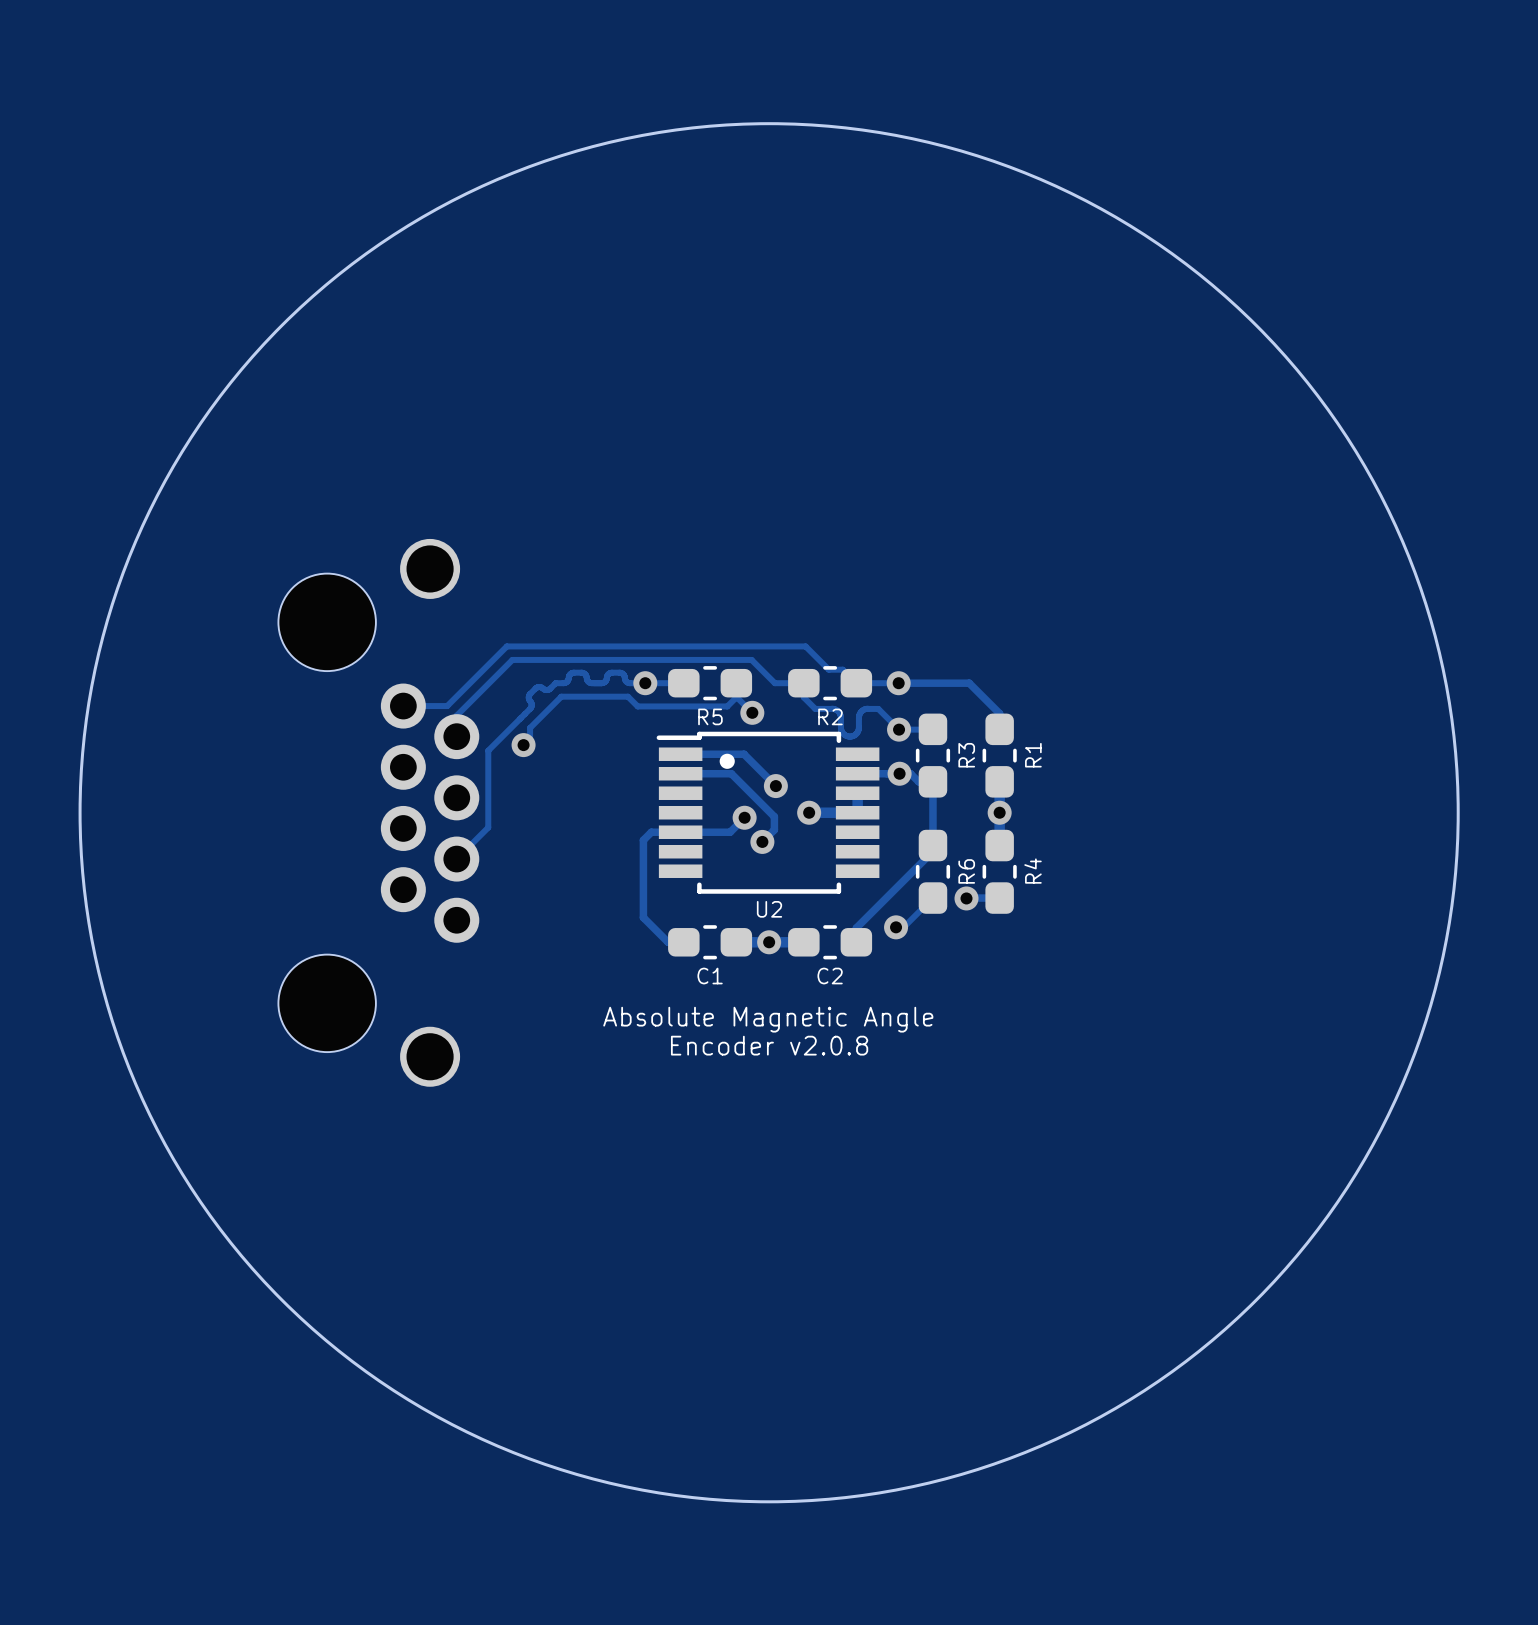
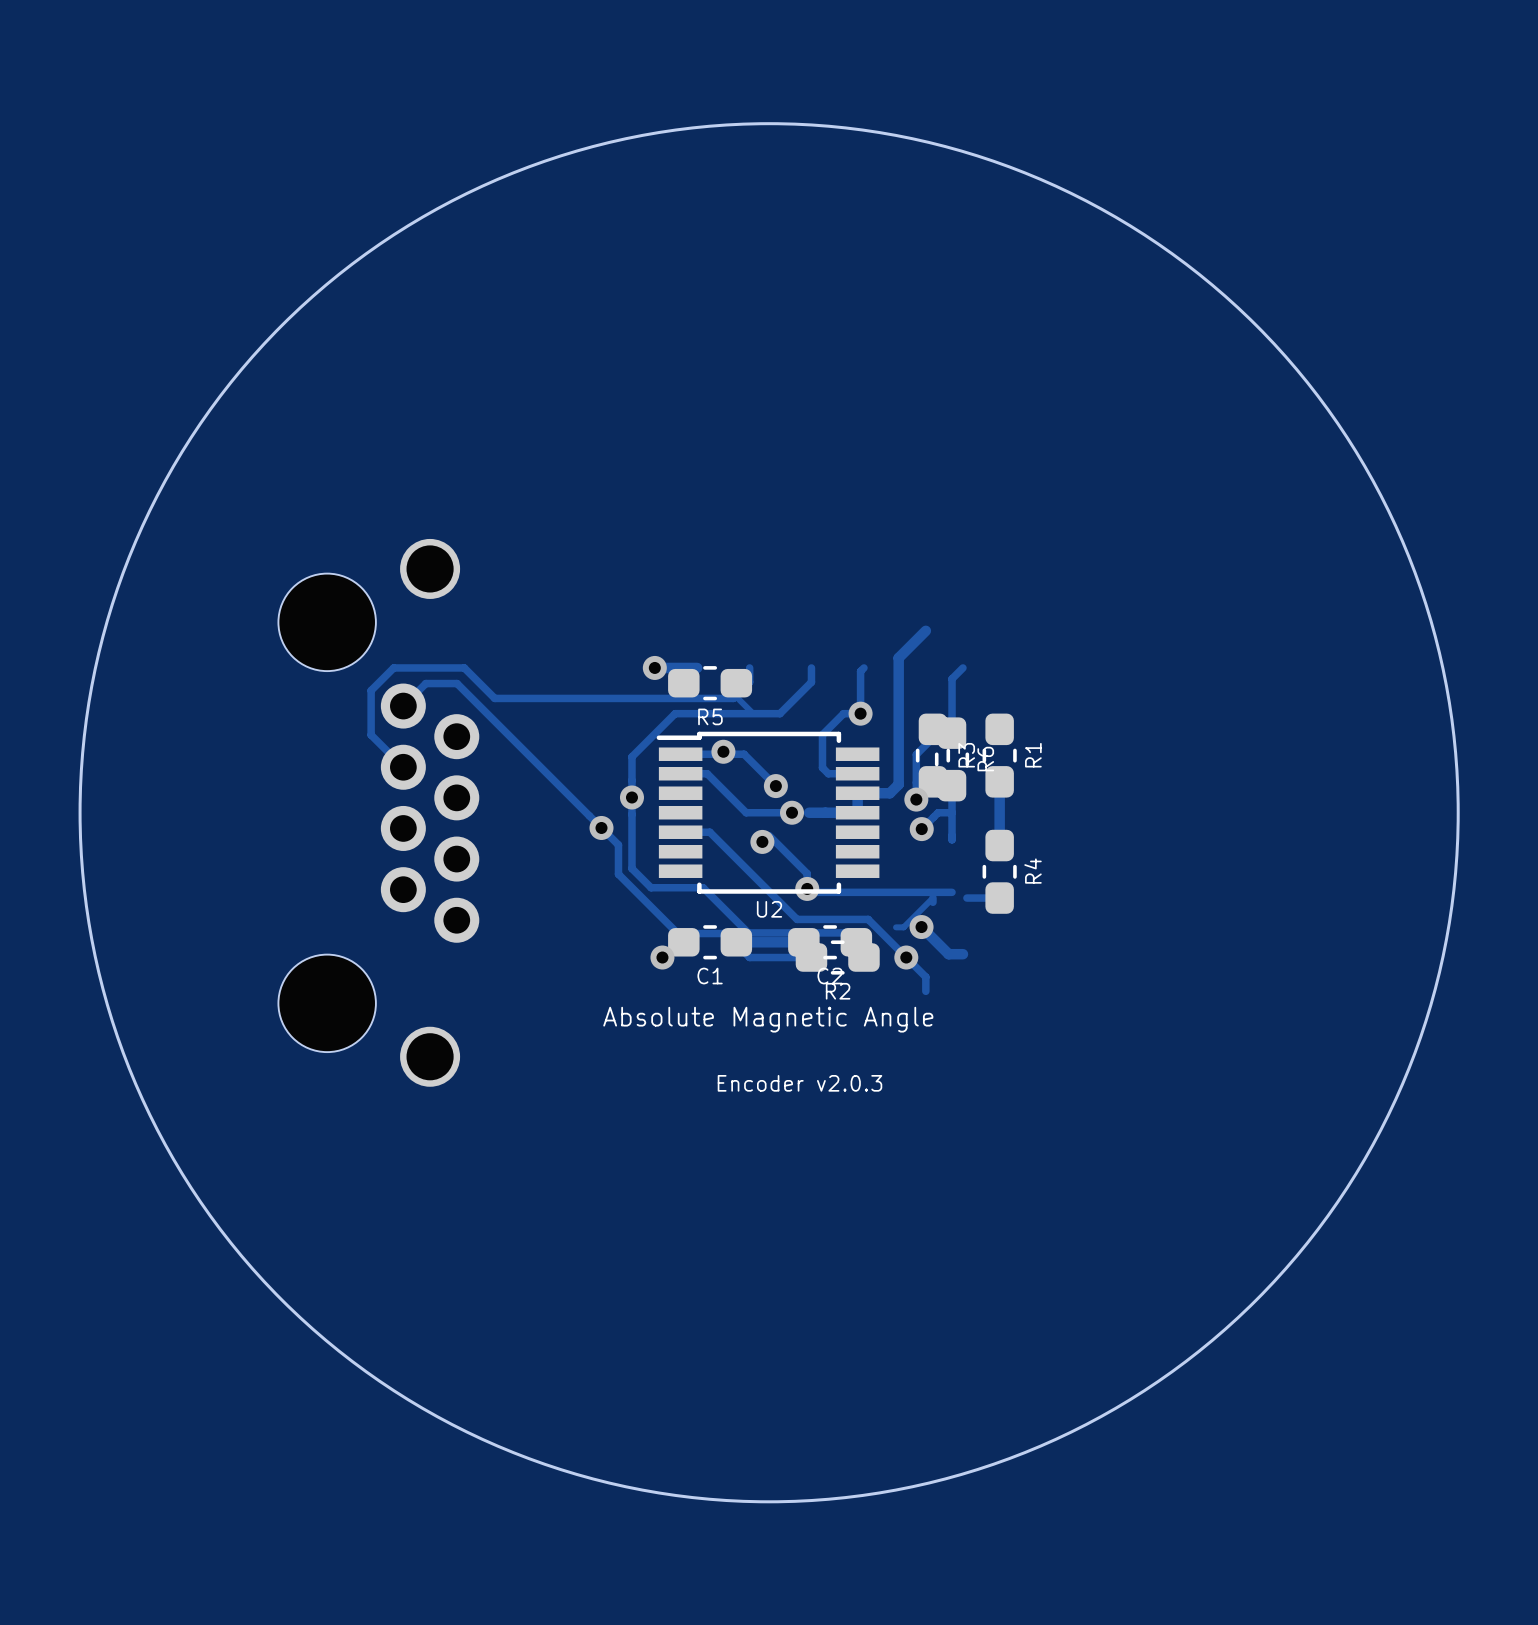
track: none -> (925, 630) (898, 657) (898, 784) (889, 793) (857, 793)
track: none -> (654, 667) (697, 667)
track: none -> (749, 667) (749, 682) (733, 698) (494, 698) (464, 667) (393, 667) (371, 690) (371, 735) (403, 767)
track: none -> (811, 667) (811, 682) (780, 713) (675, 713) (631, 756) (631, 868) (651, 887) (703, 887) (748, 932) (853, 932) (863, 943) (863, 957)
track: none -> (962, 667) (952, 678) (952, 733) (937, 733) (916, 754) (916, 799)
via position: (645, 683) -> (654, 667)
track: (683, 683) (628, 683) (625, 680) (623, 674) (619, 672) (608, 673) (603, 682) (591, 683) (587, 681) (583, 673) (573, 672) (569, 674) (566, 682) (555, 683) (548, 689) (536, 687) (529, 695) (531, 707) (488, 750) (488, 827) (456, 859) -> none
track: (736, 683) (736, 697) (727, 706) (637, 706) (628, 696) (561, 696) (530, 727) (530, 738) (523, 745) -> none
R2 position: (830, 683) -> (837, 957)
via: (898, 683) -> none
track: (403, 706) (447, 706) (506, 646) (805, 646) (828, 669) (842, 669) (856, 683) (969, 683) (999, 713) (999, 729) -> (403, 706) (425, 683) (457, 683) (618, 844) (618, 874) (677, 933) (725, 933) (749, 957) (811, 957)
track: (833, 708) (840, 715) (841, 731) (849, 736) (858, 731) (859, 715) (865, 708) -> none
track: (833, 708) (815, 708) (803, 697) (803, 683) (774, 683) (751, 659) (512, 659) (456, 715) (456, 736) -> none
track: (865, 708) (878, 708) (899, 729) (932, 729) -> none
via: (752, 712) -> none
via: none -> (860, 713)
via: (899, 729) -> none
via: (523, 745) -> none
via: none -> (723, 751)
drawing: [719, 753, 735, 769] -> none
track: (707, 773) (731, 773) (774, 816) (774, 829) (762, 841) -> (707, 773) (746, 812) (792, 812)
track: (857, 773) (910, 773) (918, 781) (932, 781) (932, 851) (856, 928) (856, 942) -> (857, 773) (828, 773) (822, 767) (822, 734) (843, 713) (860, 713) (860, 671) (863, 667)
via: (899, 773) -> none
track: none -> (952, 785) (952, 839)
via: none -> (631, 797)
via: none -> (916, 799)
via position: (809, 812) -> (792, 812)
track: none -> (952, 812) (938, 812) (921, 829)
via: (999, 812) -> none
track: (744, 817) (730, 832) (709, 832) -> (925, 991) (925, 977) (868, 919) (797, 919) (709, 832)
via: (744, 817) -> none
via: none -> (601, 827)
via: none -> (921, 829)
track: (680, 832) (651, 832) (643, 840) (643, 917) (668, 942) (683, 942) -> none
track: none -> (769, 835) (807, 873) (807, 888) (810, 892) (952, 892)
R6 position: (932, 871) -> (952, 759)
via: none -> (807, 888)
via: (966, 898) -> none
via: (896, 927) -> none
track: none -> (921, 927) (948, 954) (962, 954) (952, 954)
via: none -> (921, 927)
via: (769, 942) -> none
via: none -> (662, 957)
via: none -> (906, 957)
text: Encoder v2.0.8 (769, 1045) -> none
text: none -> Encoder v2.0.3 (799, 1083)

